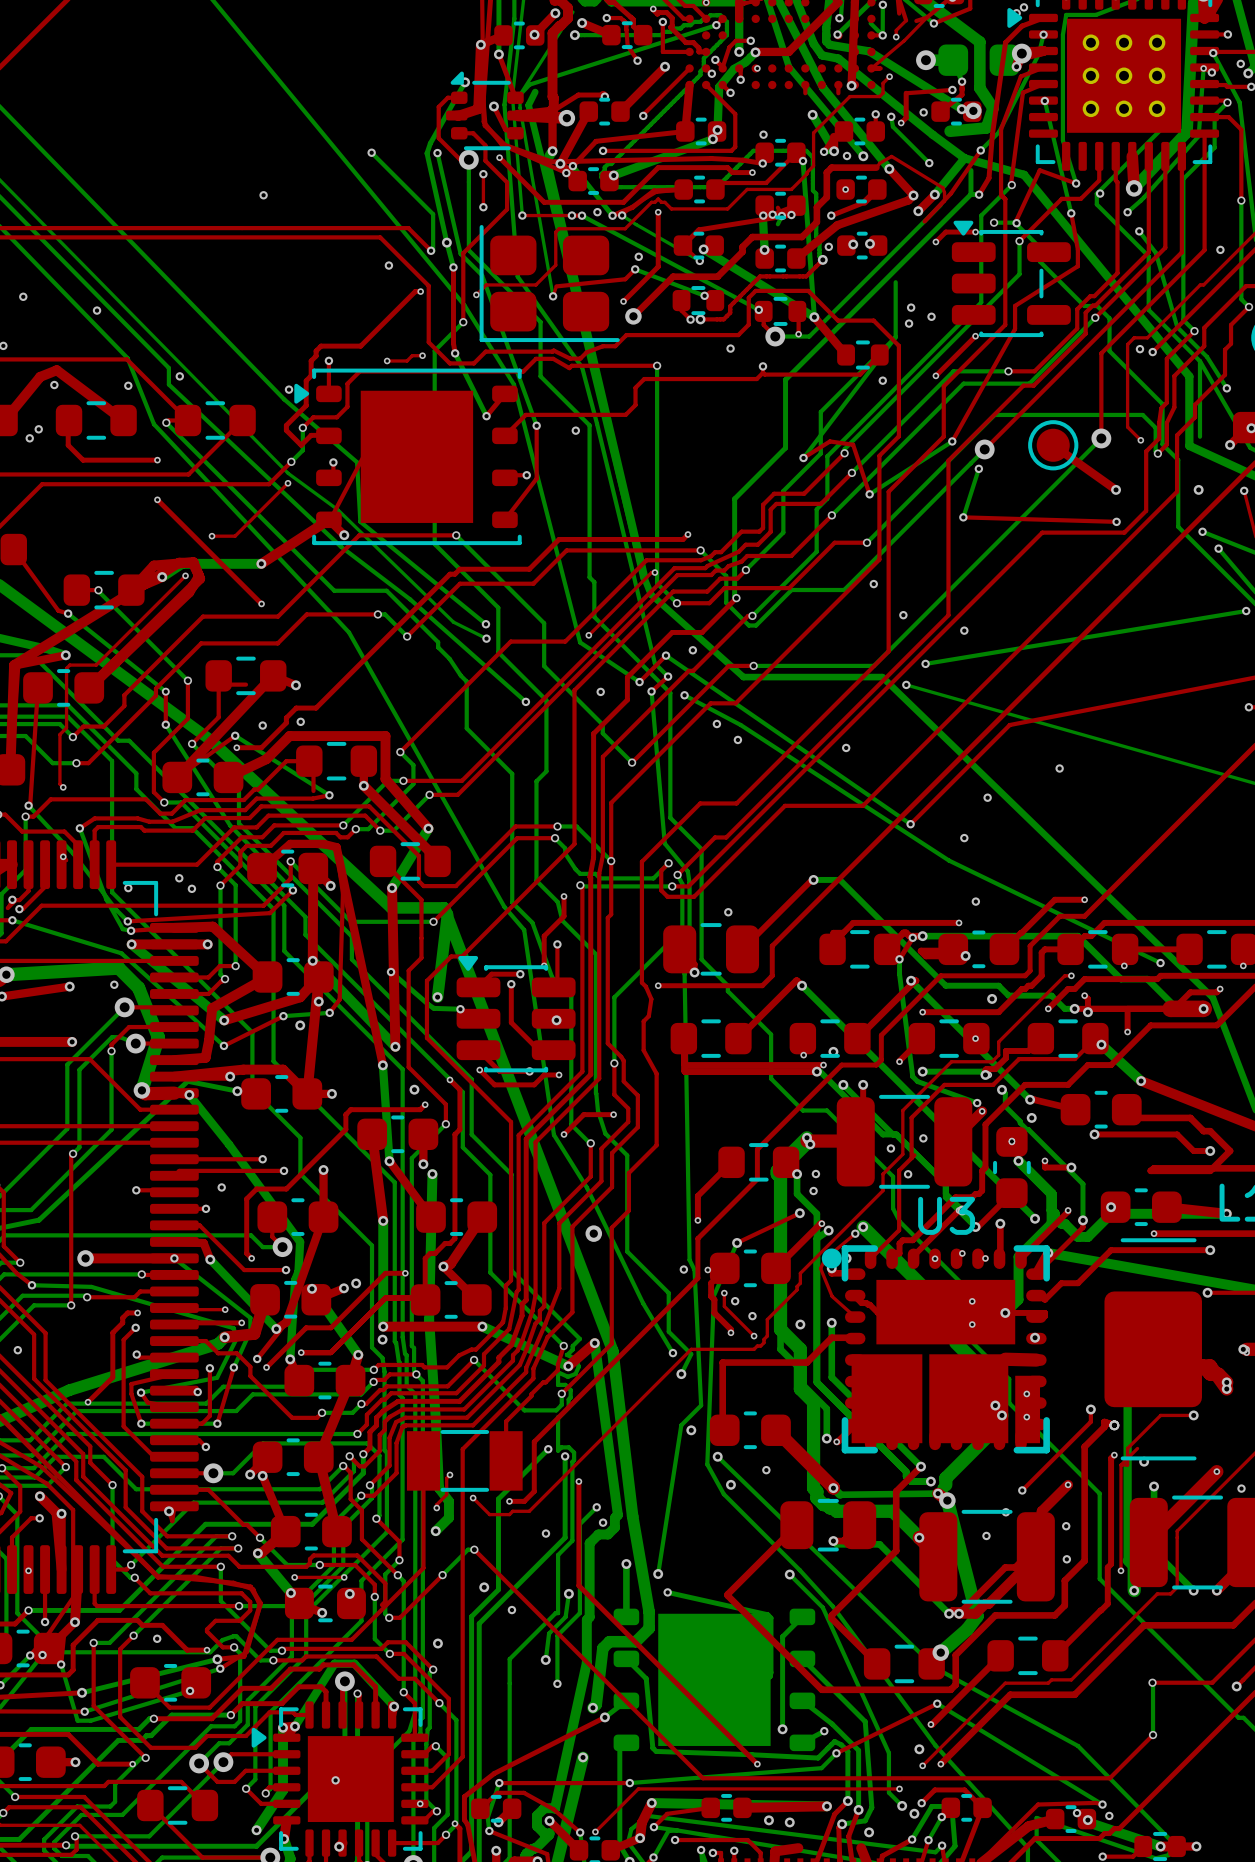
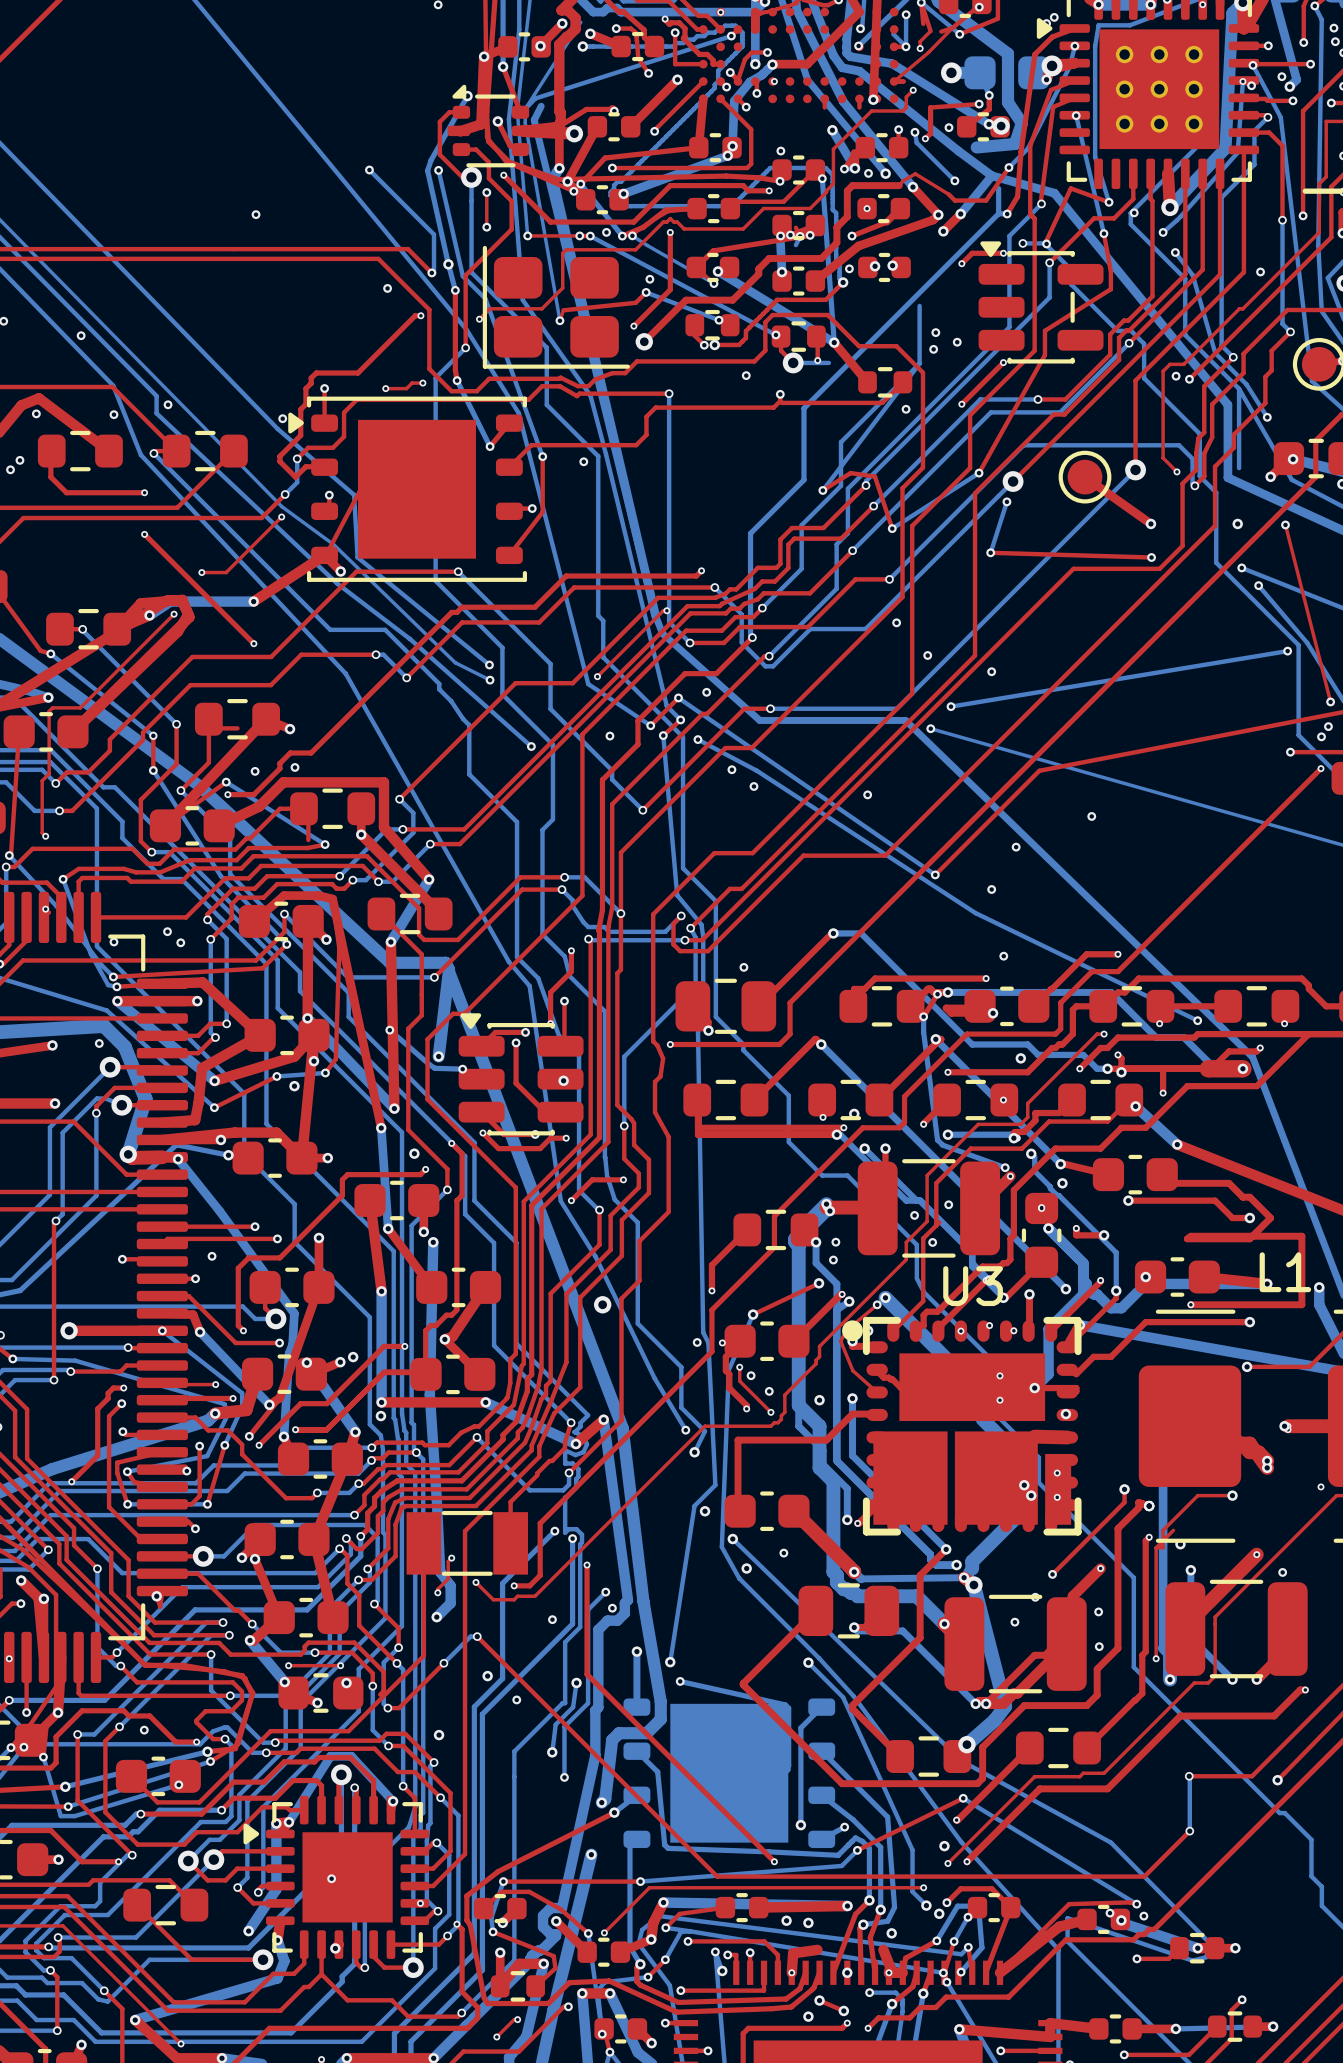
top track: (923, 175) (942, 187) (944, 192) (944, 201) (924, 221) (951, 193) (959, 181) -> (948, 194) (954, 200) (986, 200)
bottom track: (940, 205) (809, 336) -> none

